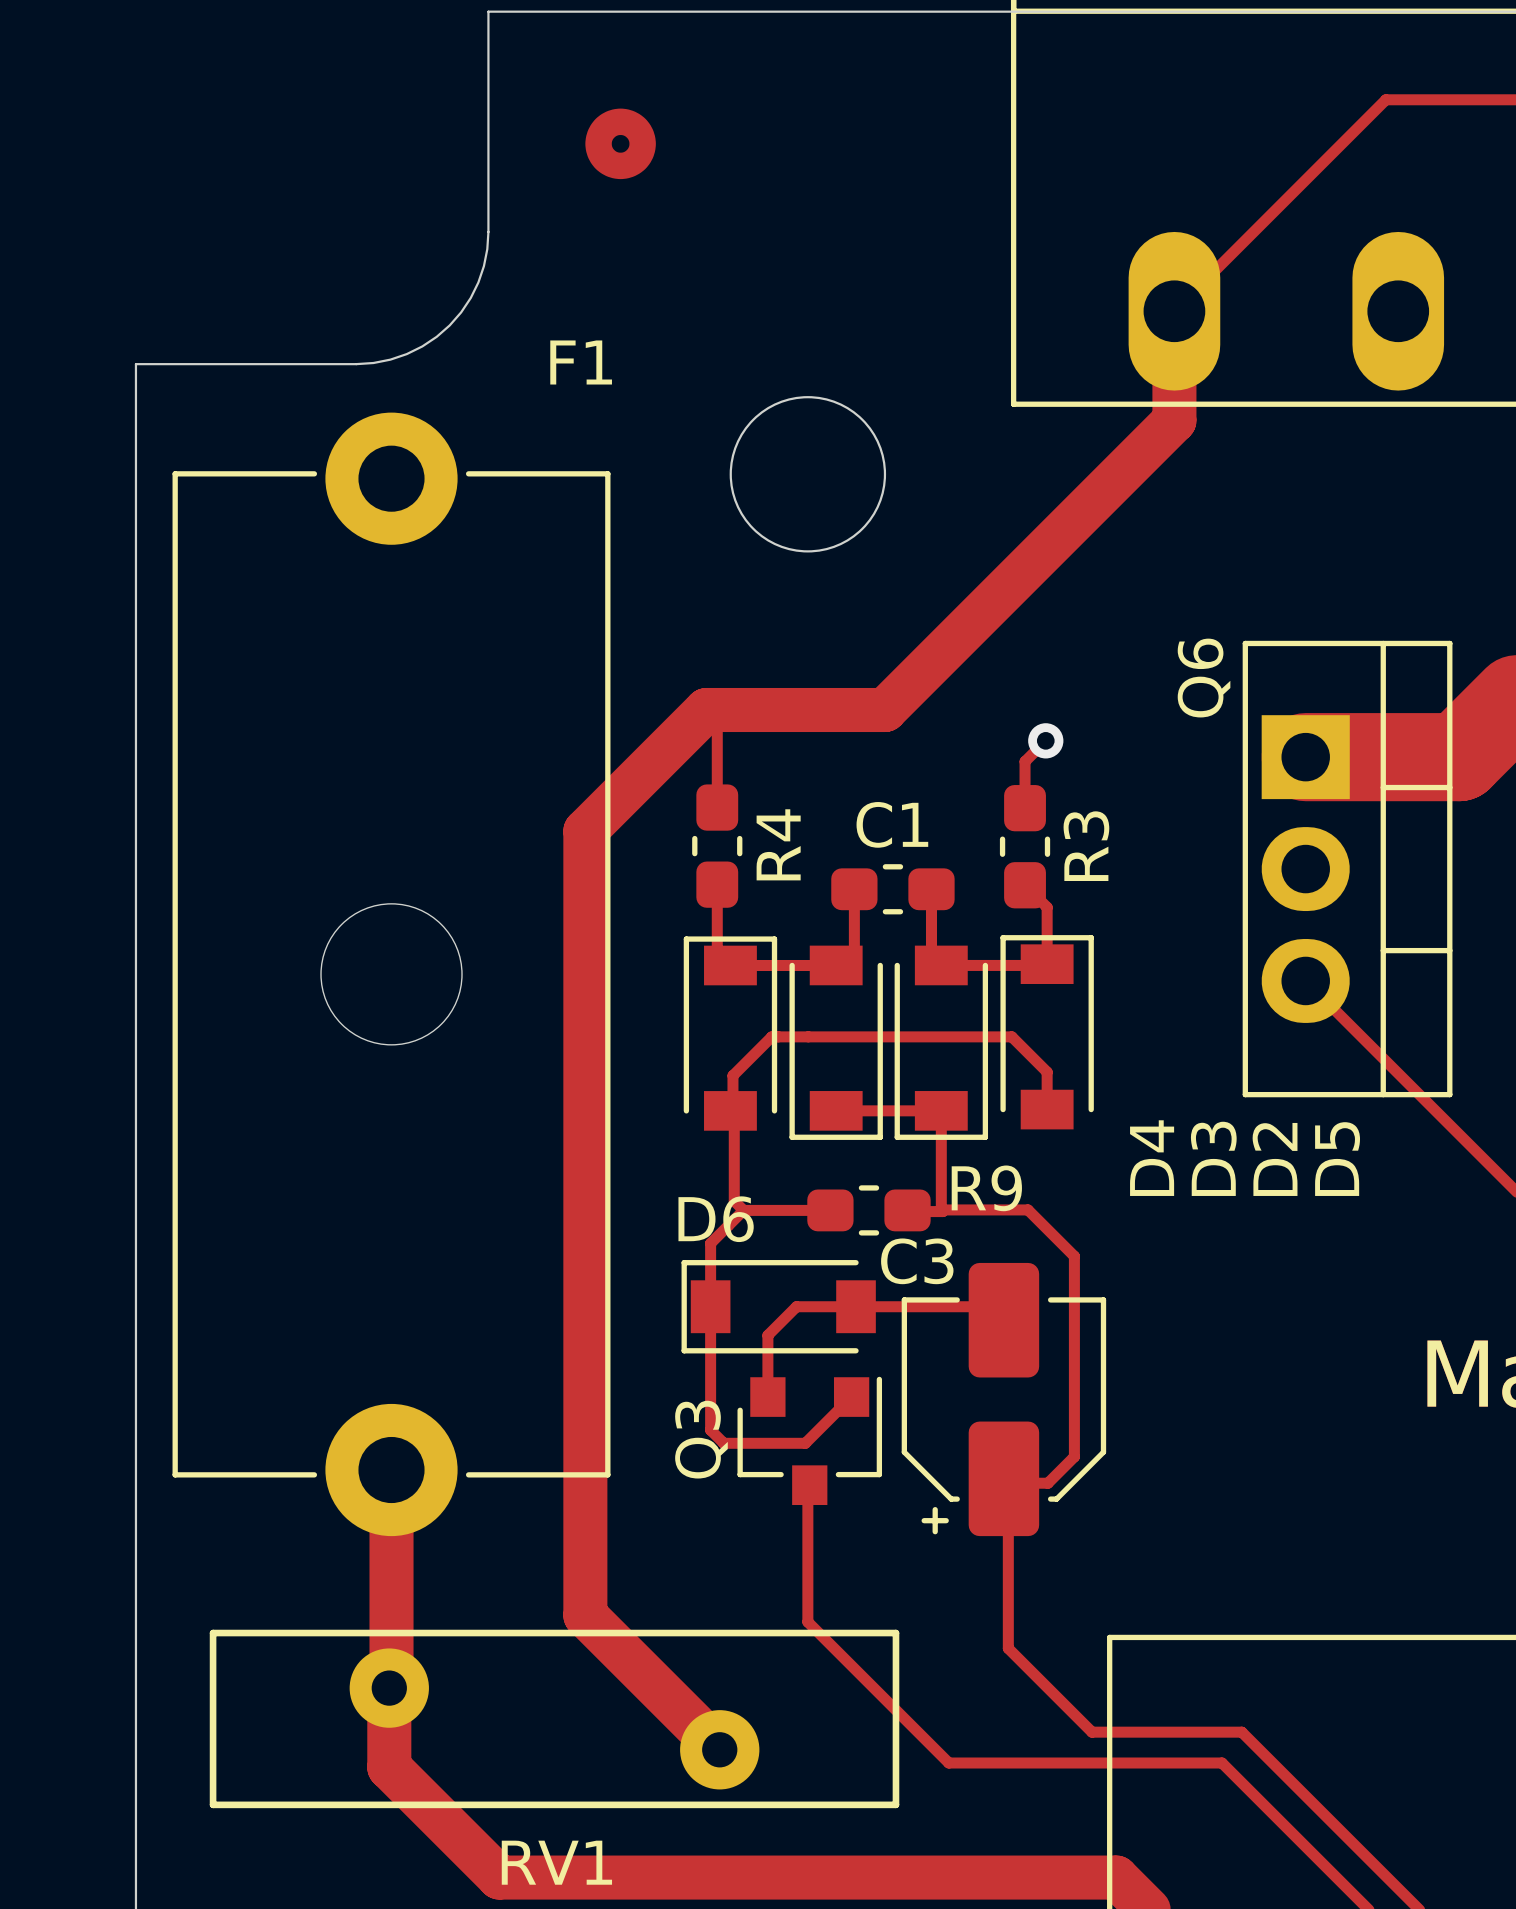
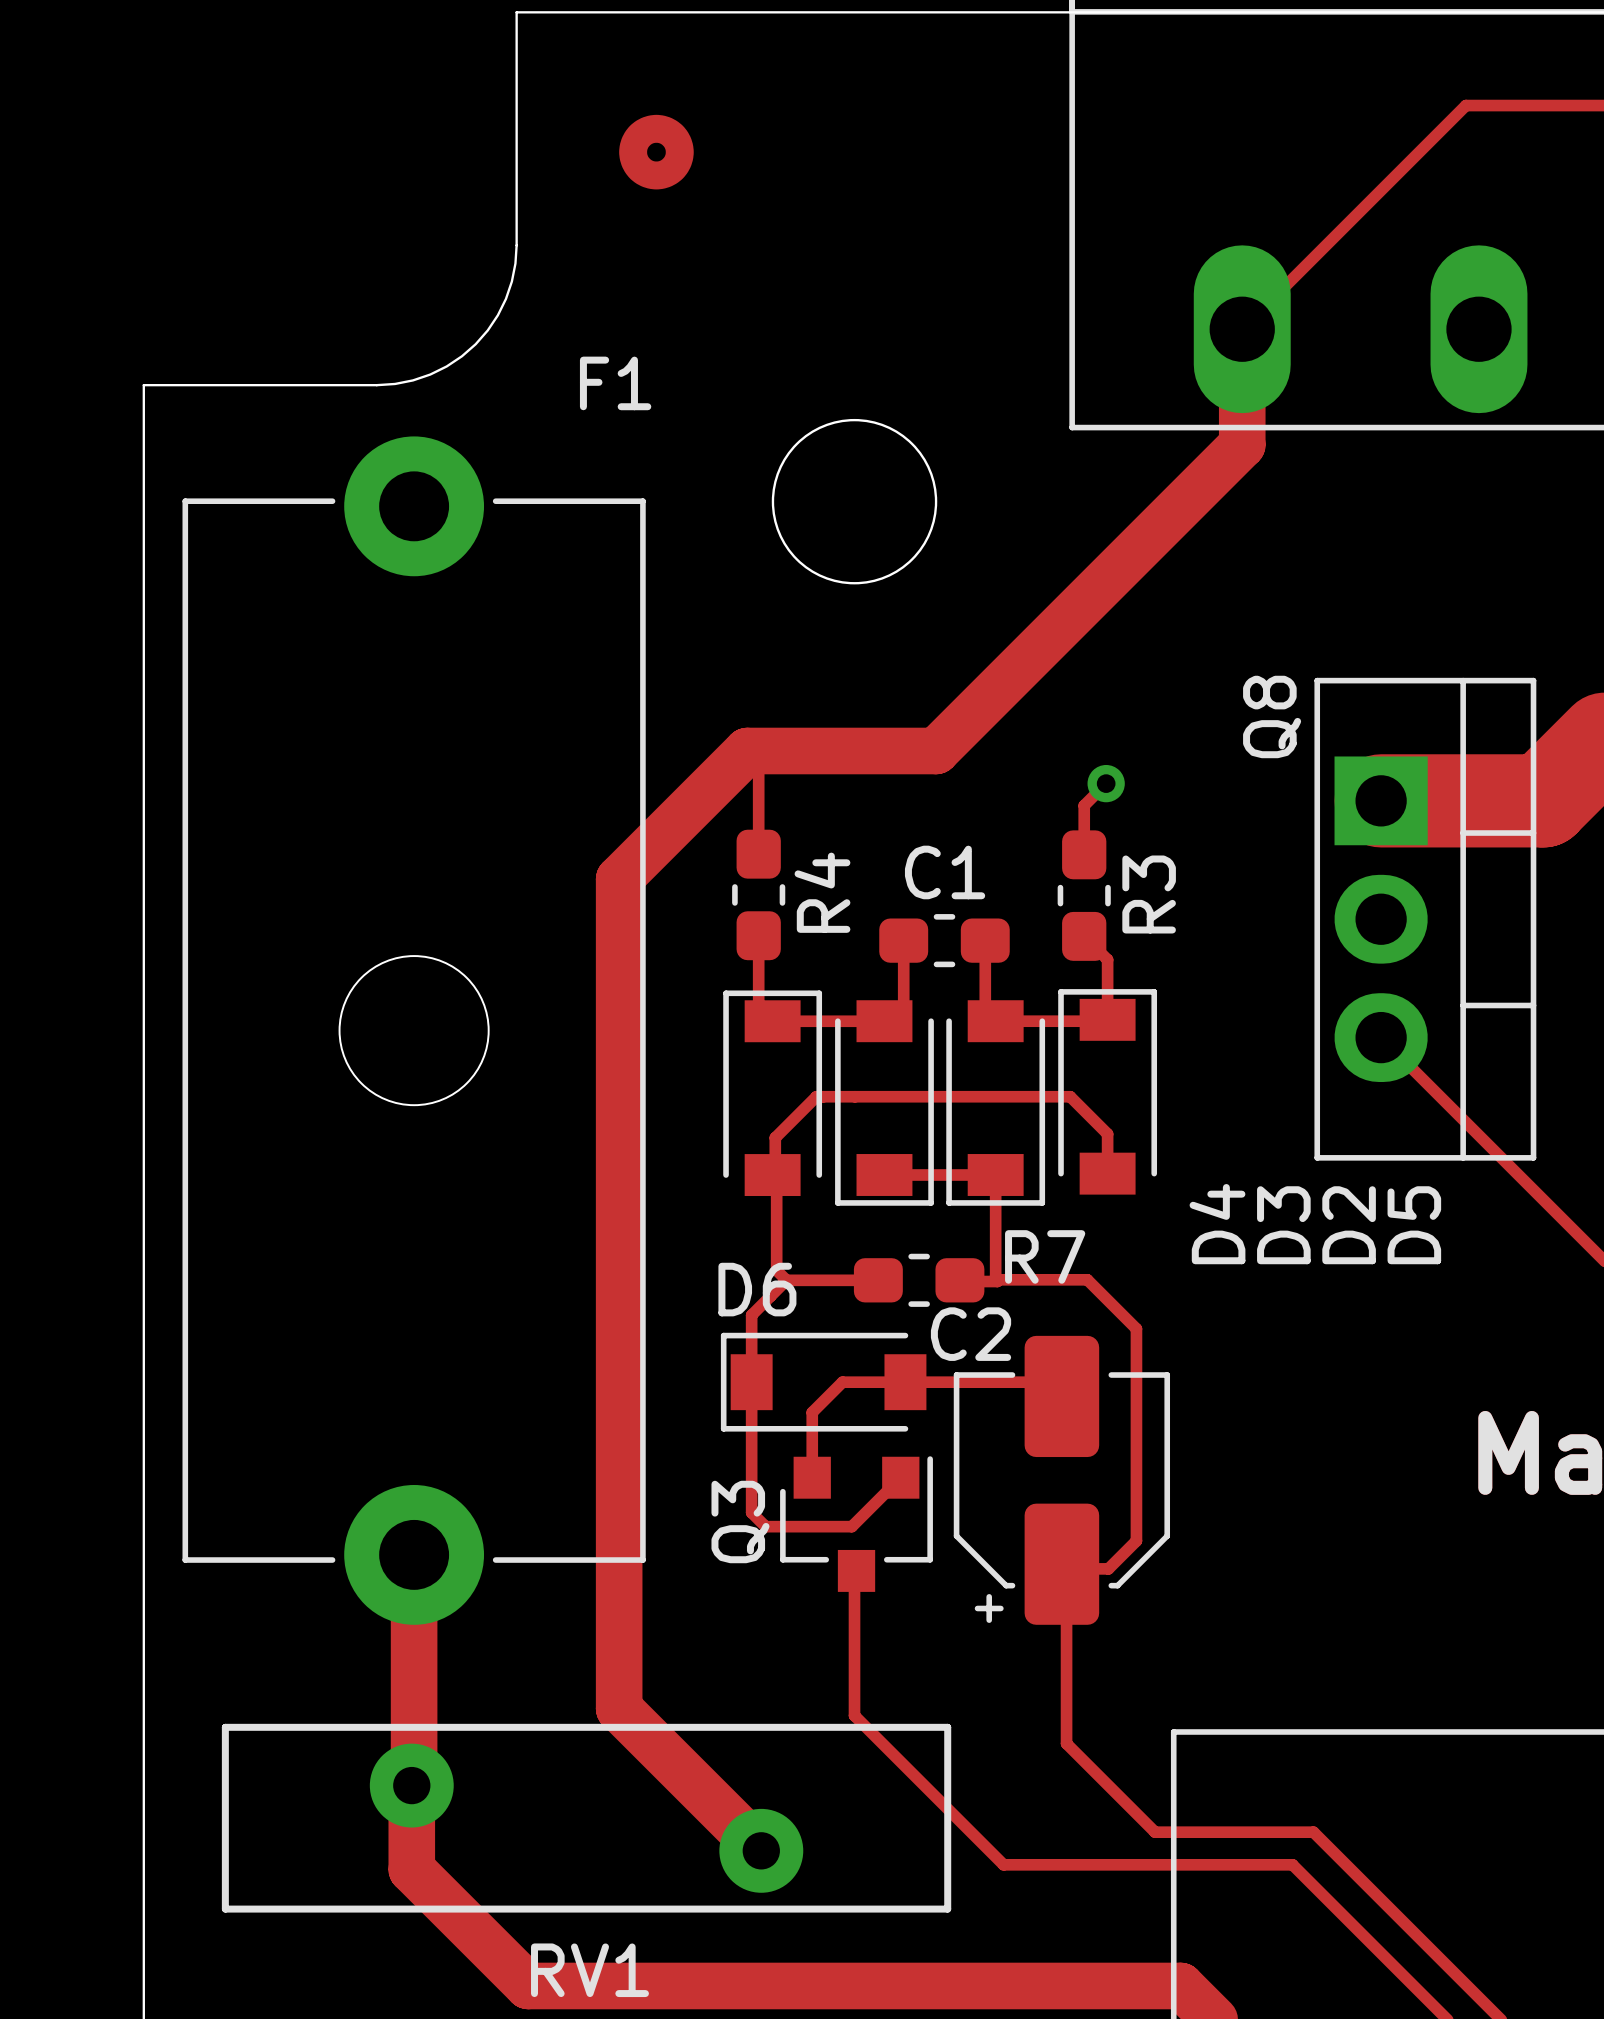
Q6 name: Q6 (1204, 678) -> Q8 (1272, 716)
R9 name: R9 (986, 1188) -> R7 (1045, 1256)
C3 name: C3 (917, 1261) -> C2 (971, 1334)

